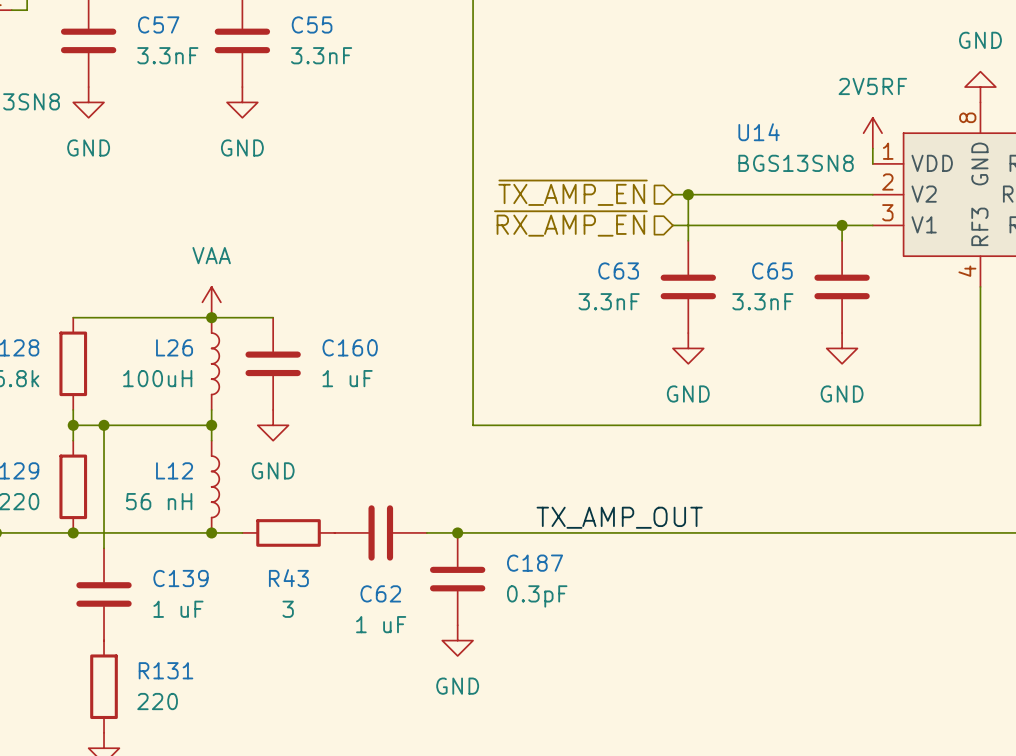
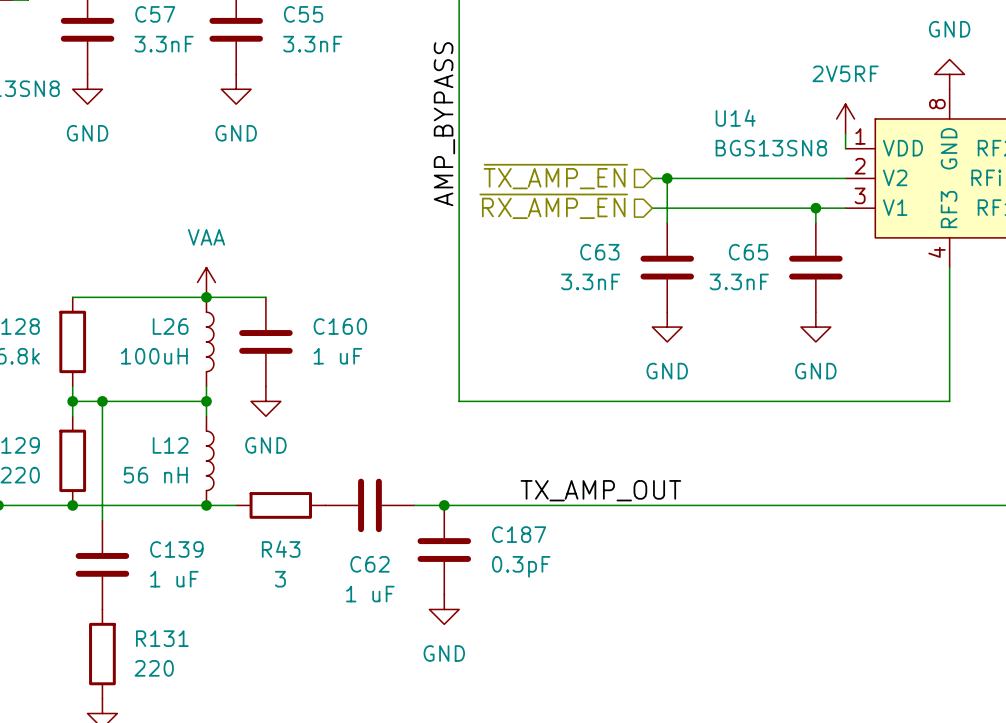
label: none -> AMP_BYPASS (444, 124)

